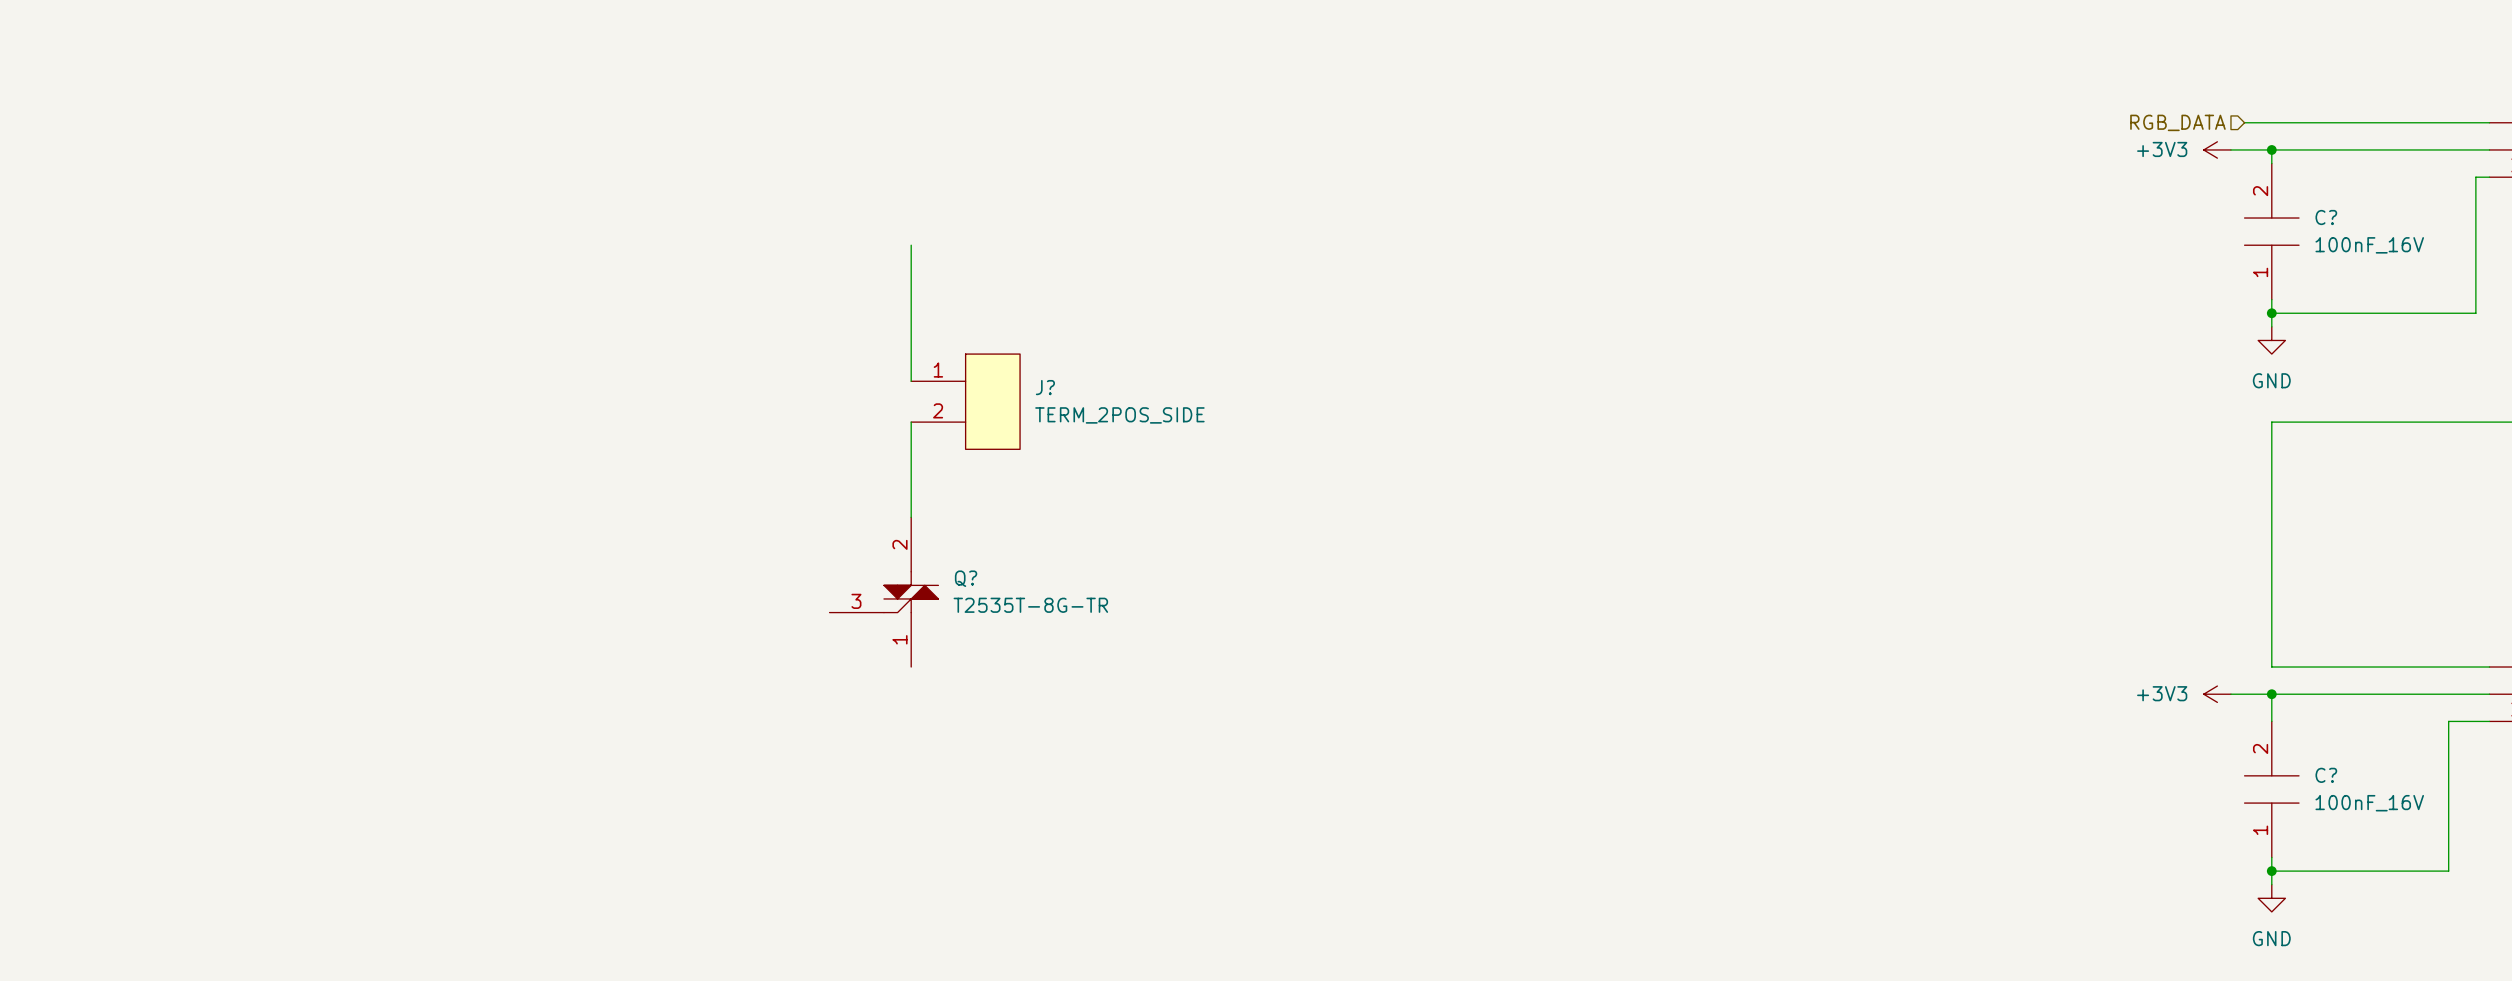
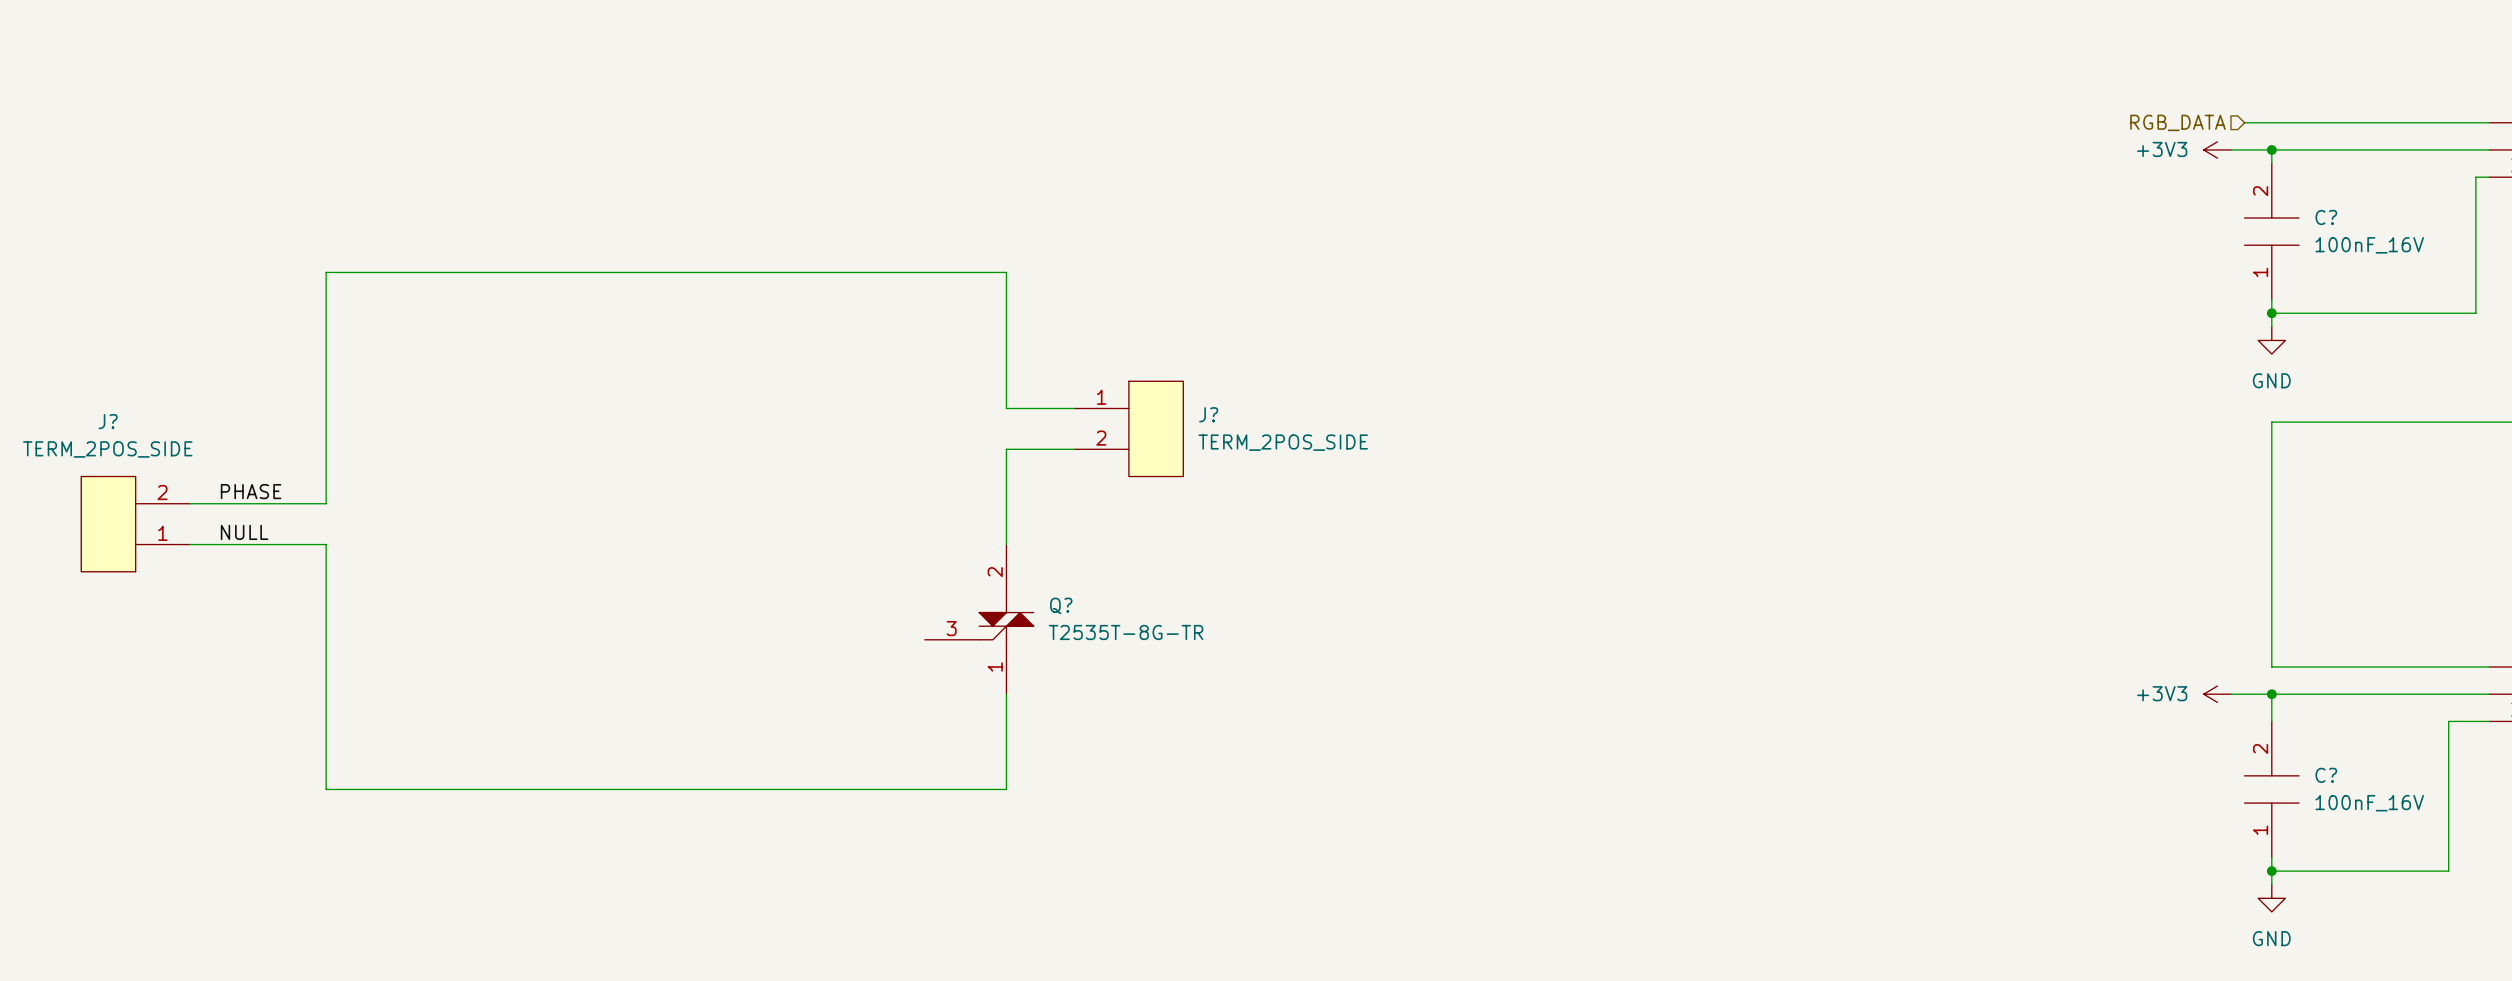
wire: (911, 245) (911, 381) -> none
J? position: (965, 401) -> (1128, 428)
wire: none -> (1074, 408) (1006, 408) (1006, 272) (326, 272) (326, 503) (190, 503)
wire: (911, 422) (911, 517) -> none
wire: none -> (1074, 449) (1006, 449) (1006, 544)
label: none -> PHASE (251, 491)
J?: none -> TERM_2POS_SIDE (135, 524)
label: none -> NULL (244, 532)
wire: none -> (190, 544) (326, 544) (326, 789) (1006, 789) (1006, 694)
Q? position: (883, 592) -> (979, 619)

